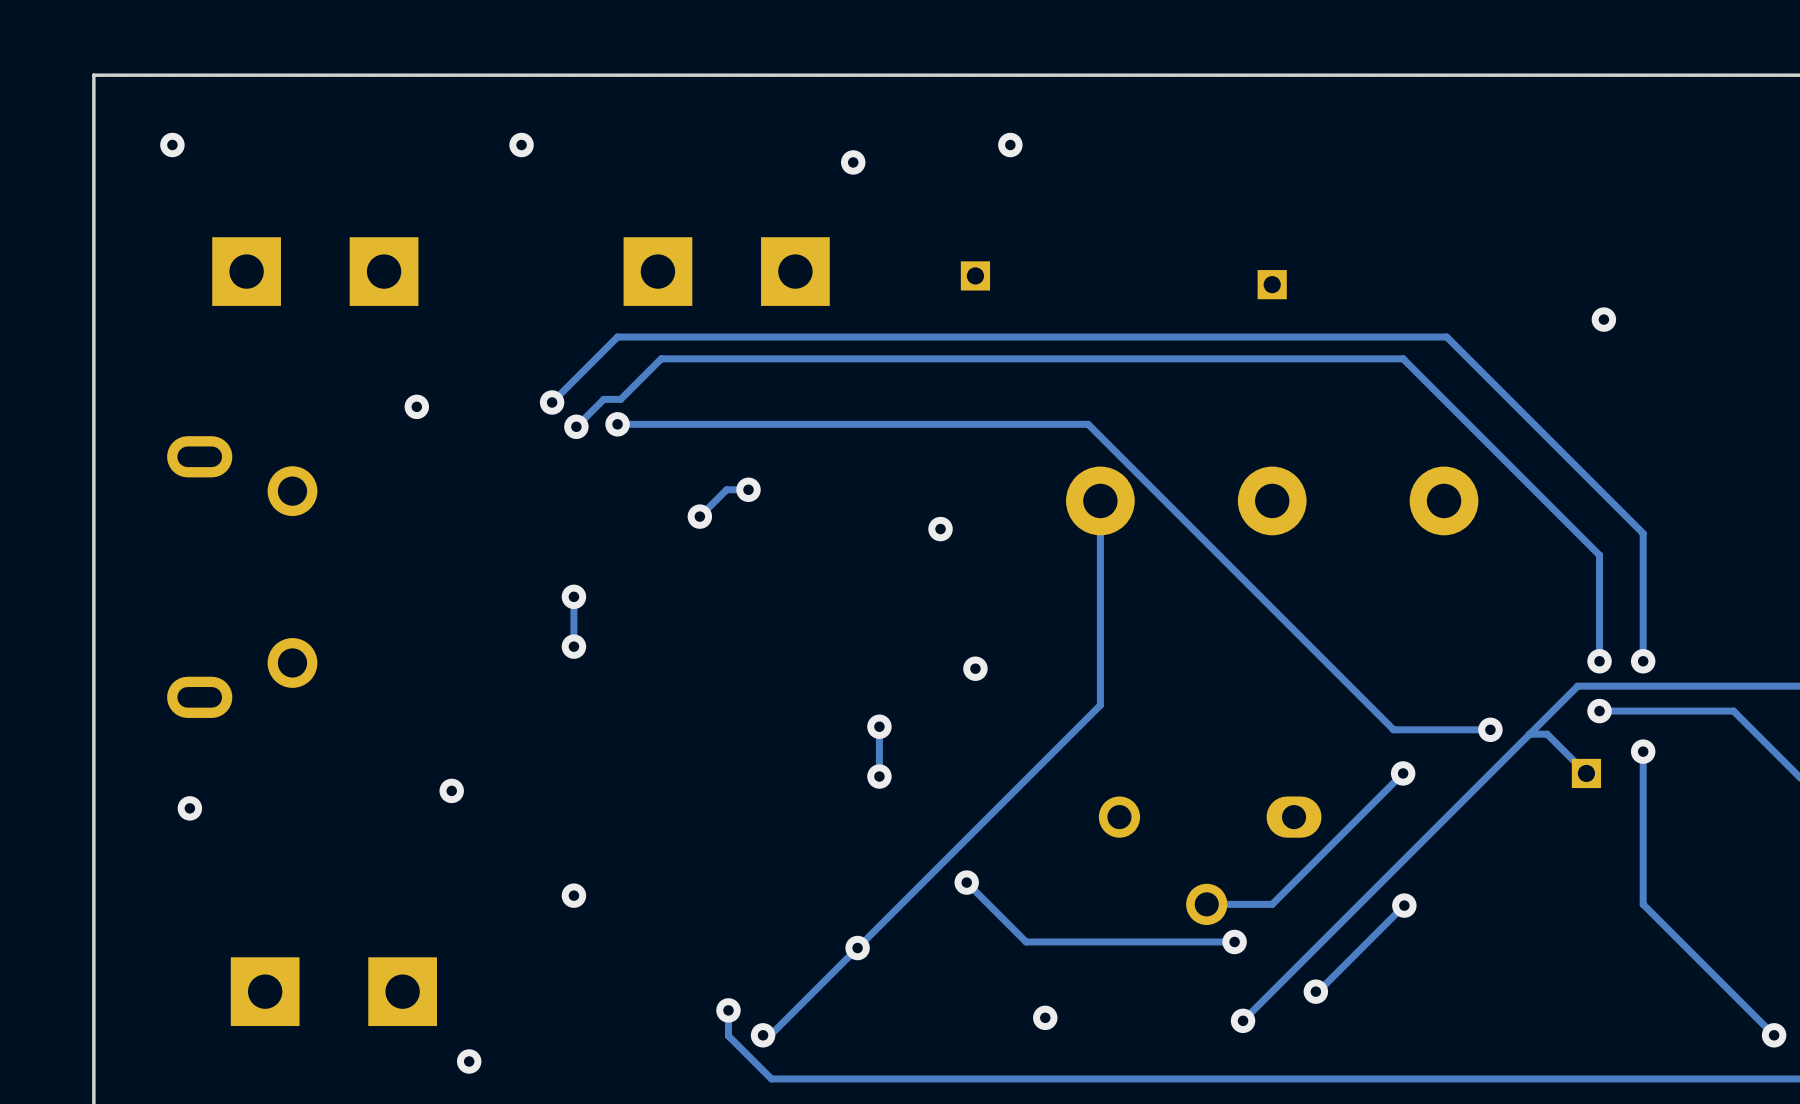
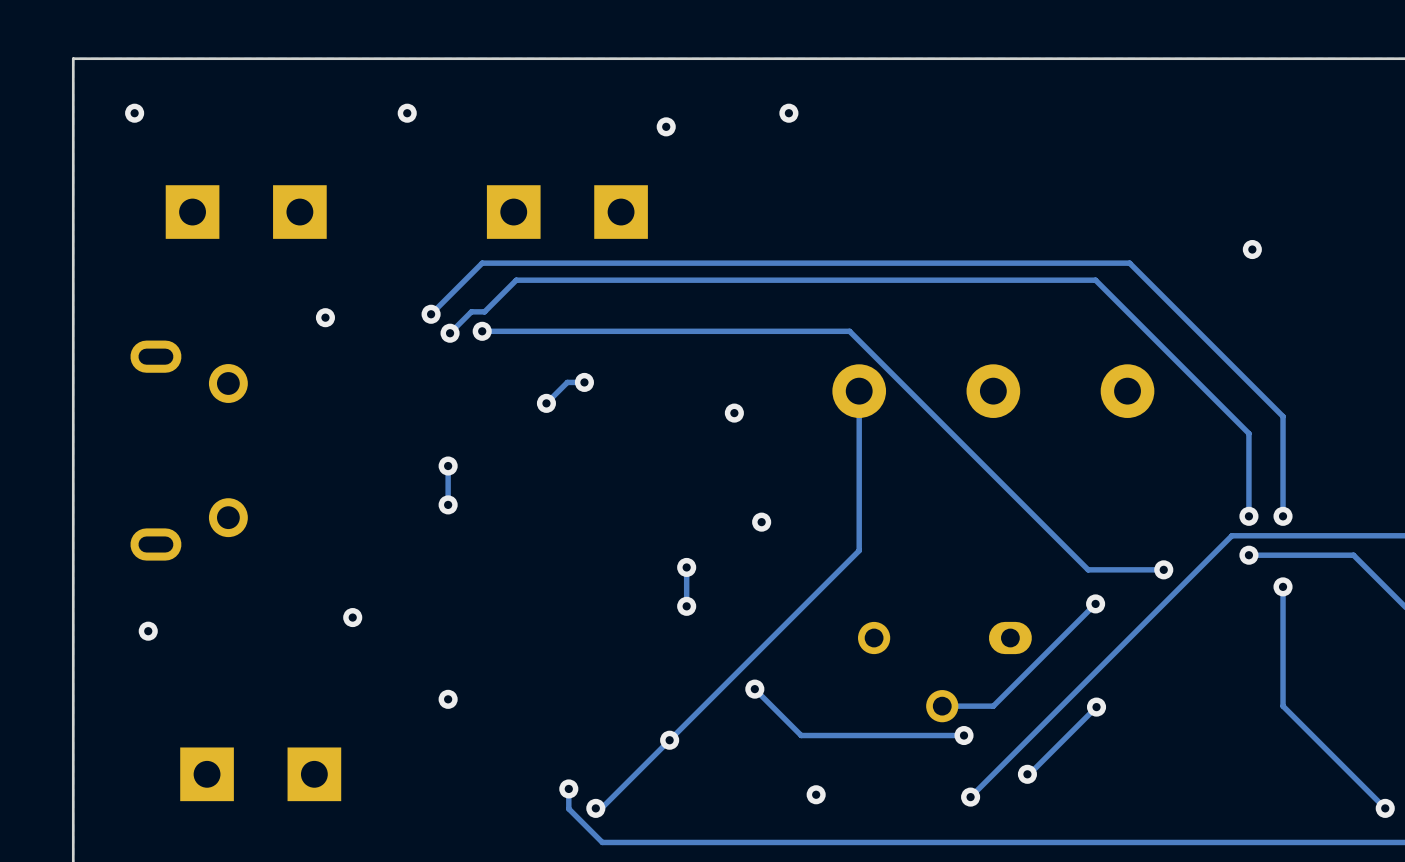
part: (975, 275) -> none
part: (1272, 284) -> none
track: (1529, 734) (1547, 734) (1586, 773) -> none
part: (1586, 773) -> none
via: (469, 1061) -> none

